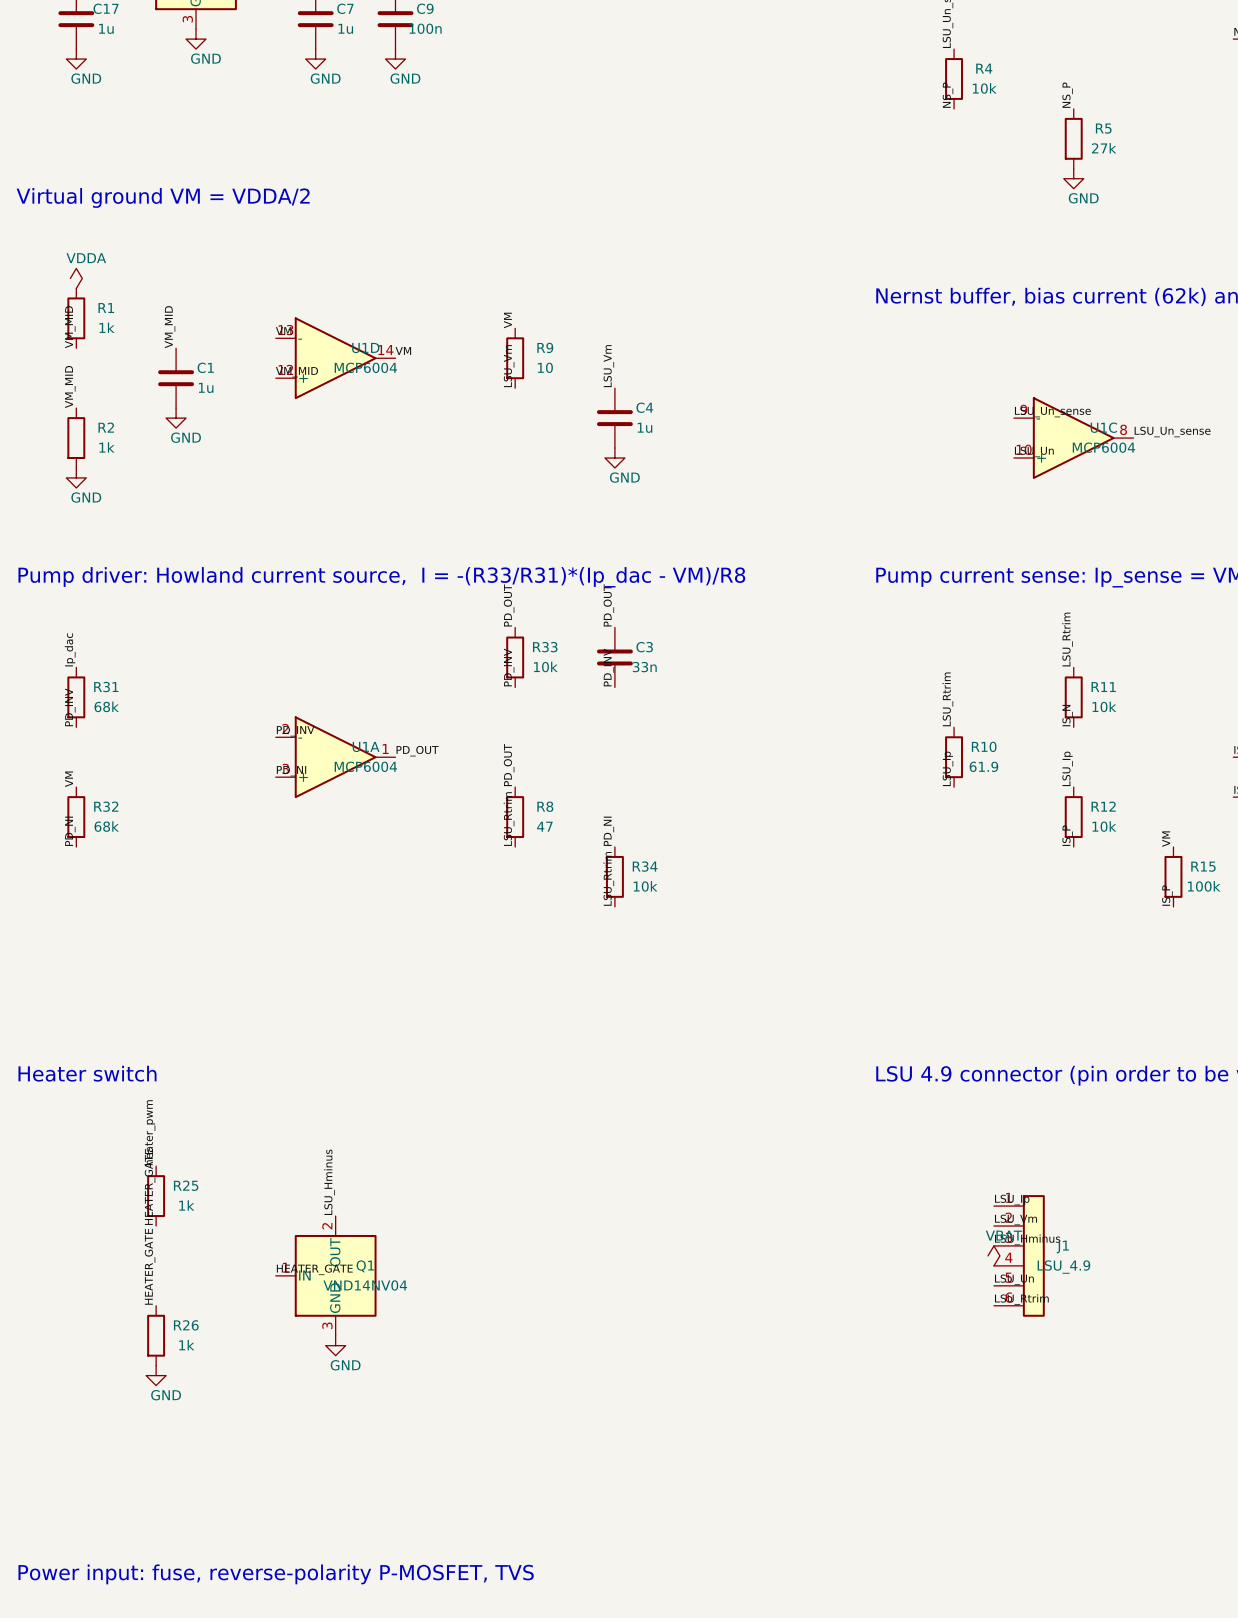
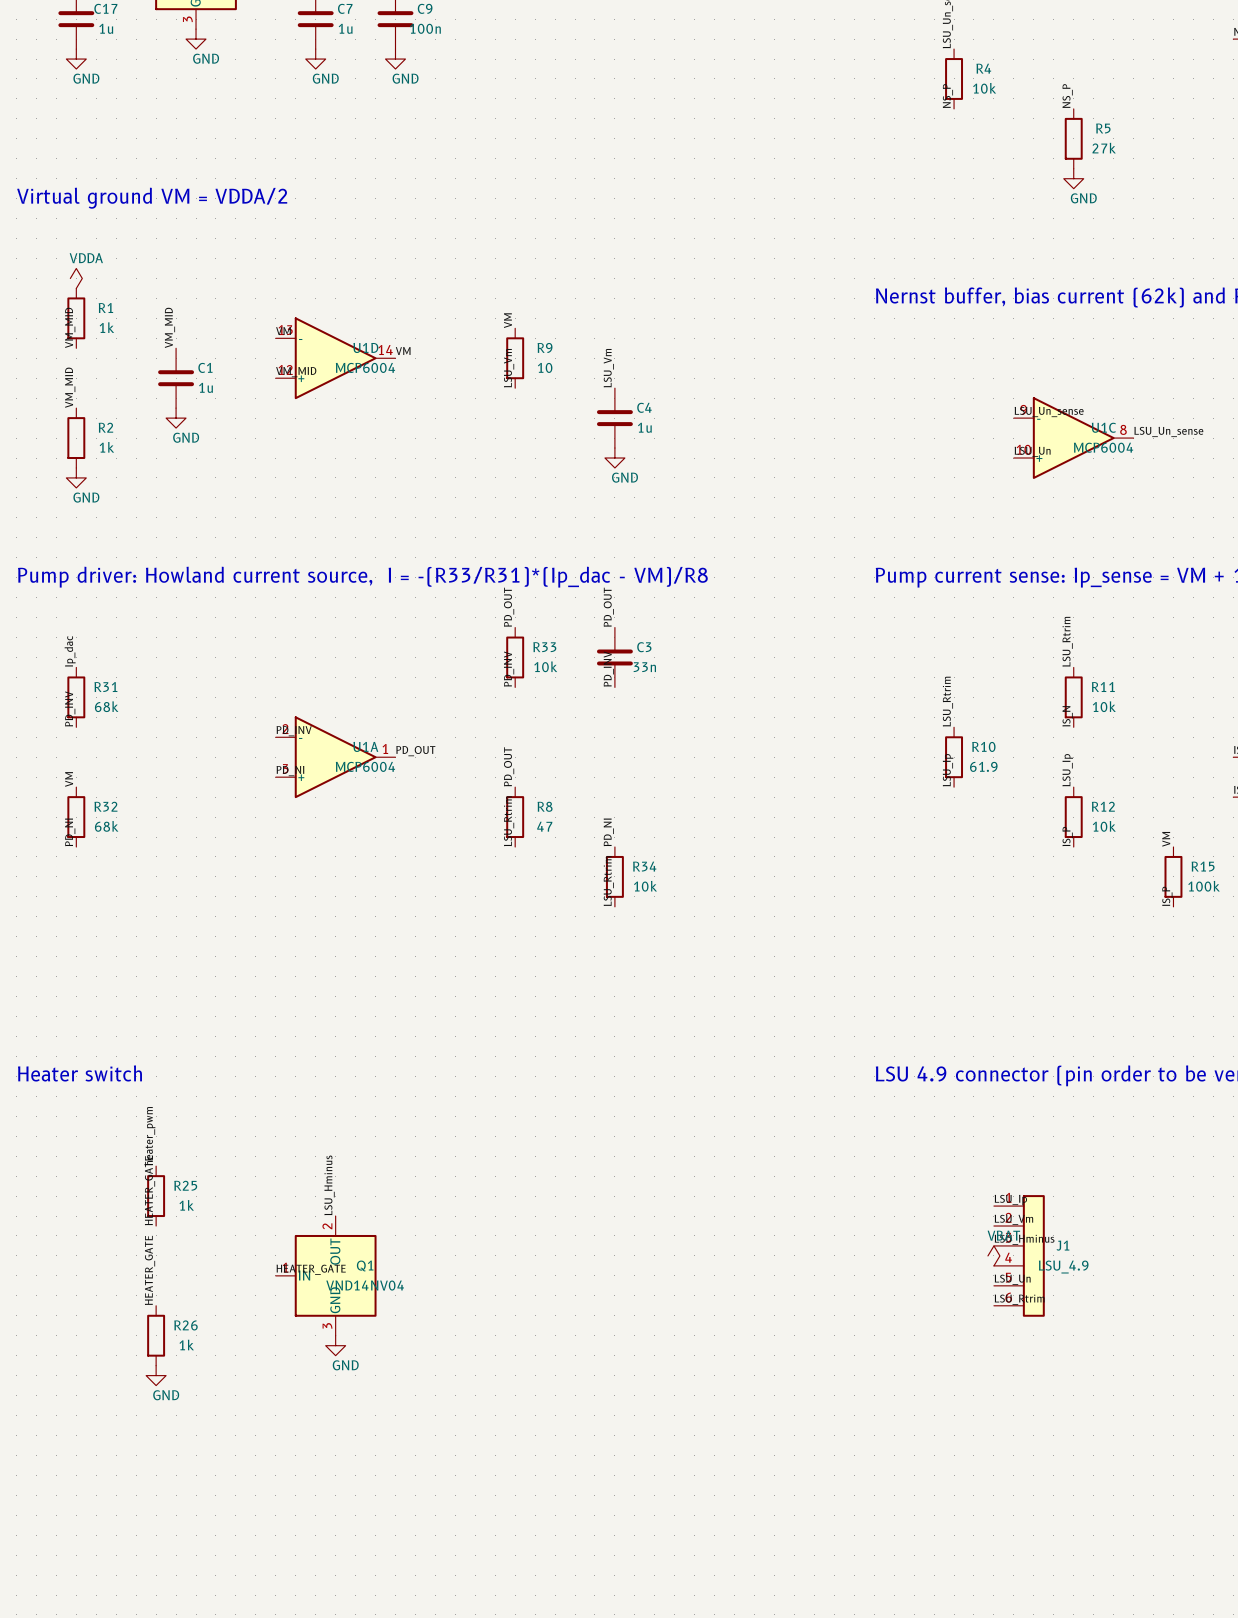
text: Power input: fuse, reverse-polarity P-MOSFET, TVS (276, 1574) -> none

